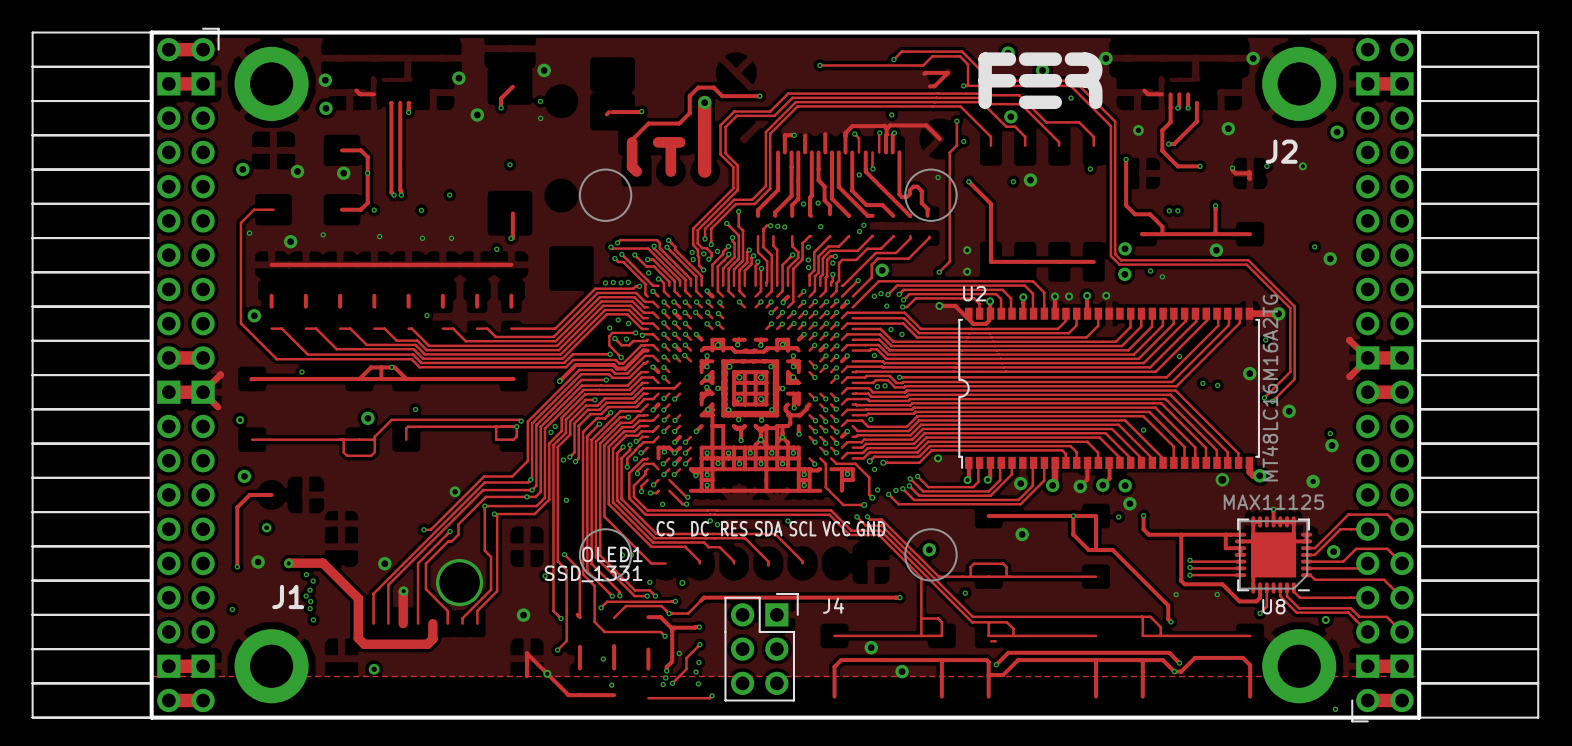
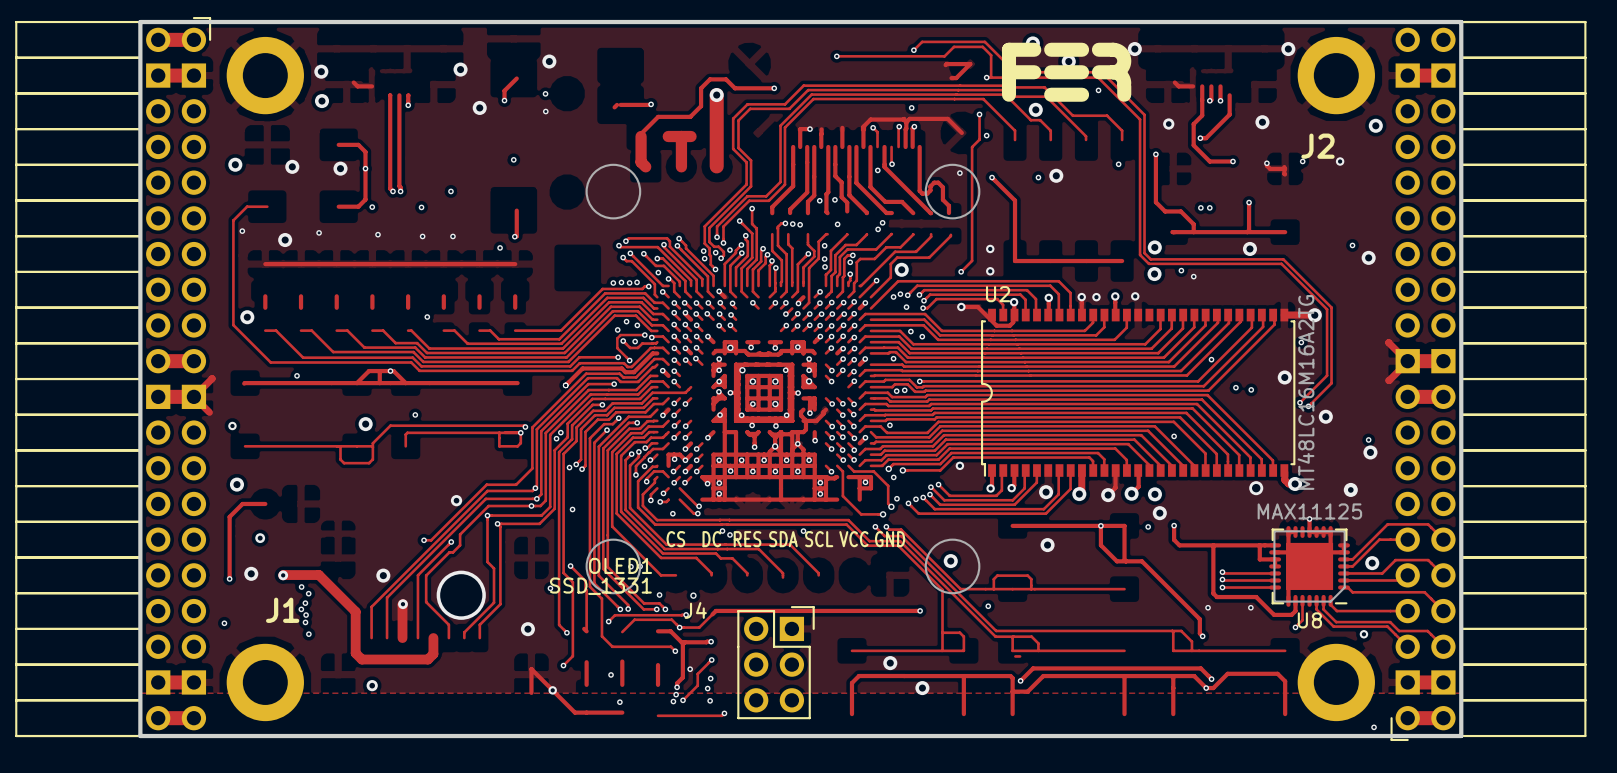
J4 name position: J4 (833, 605) -> J4 (695, 610)

